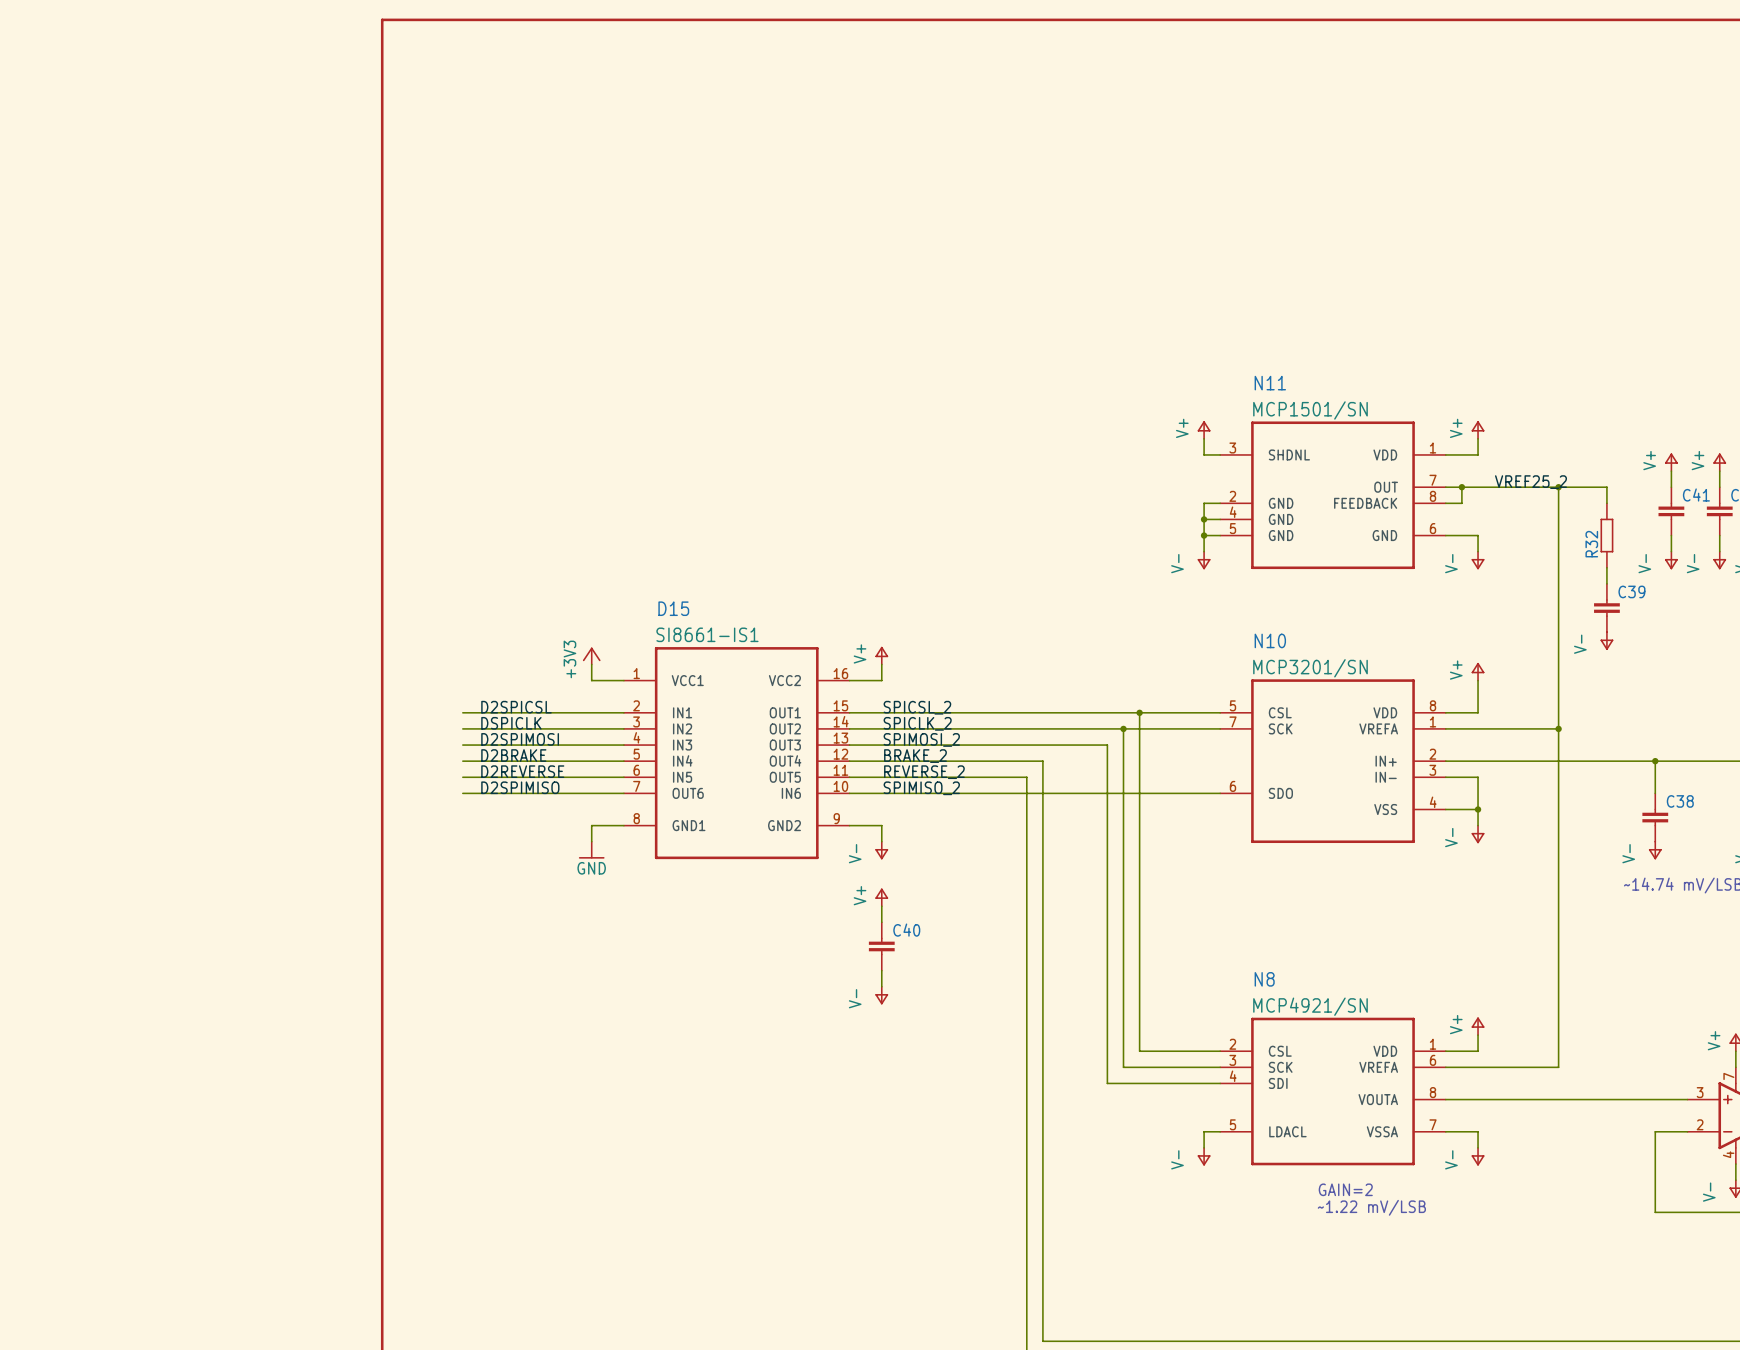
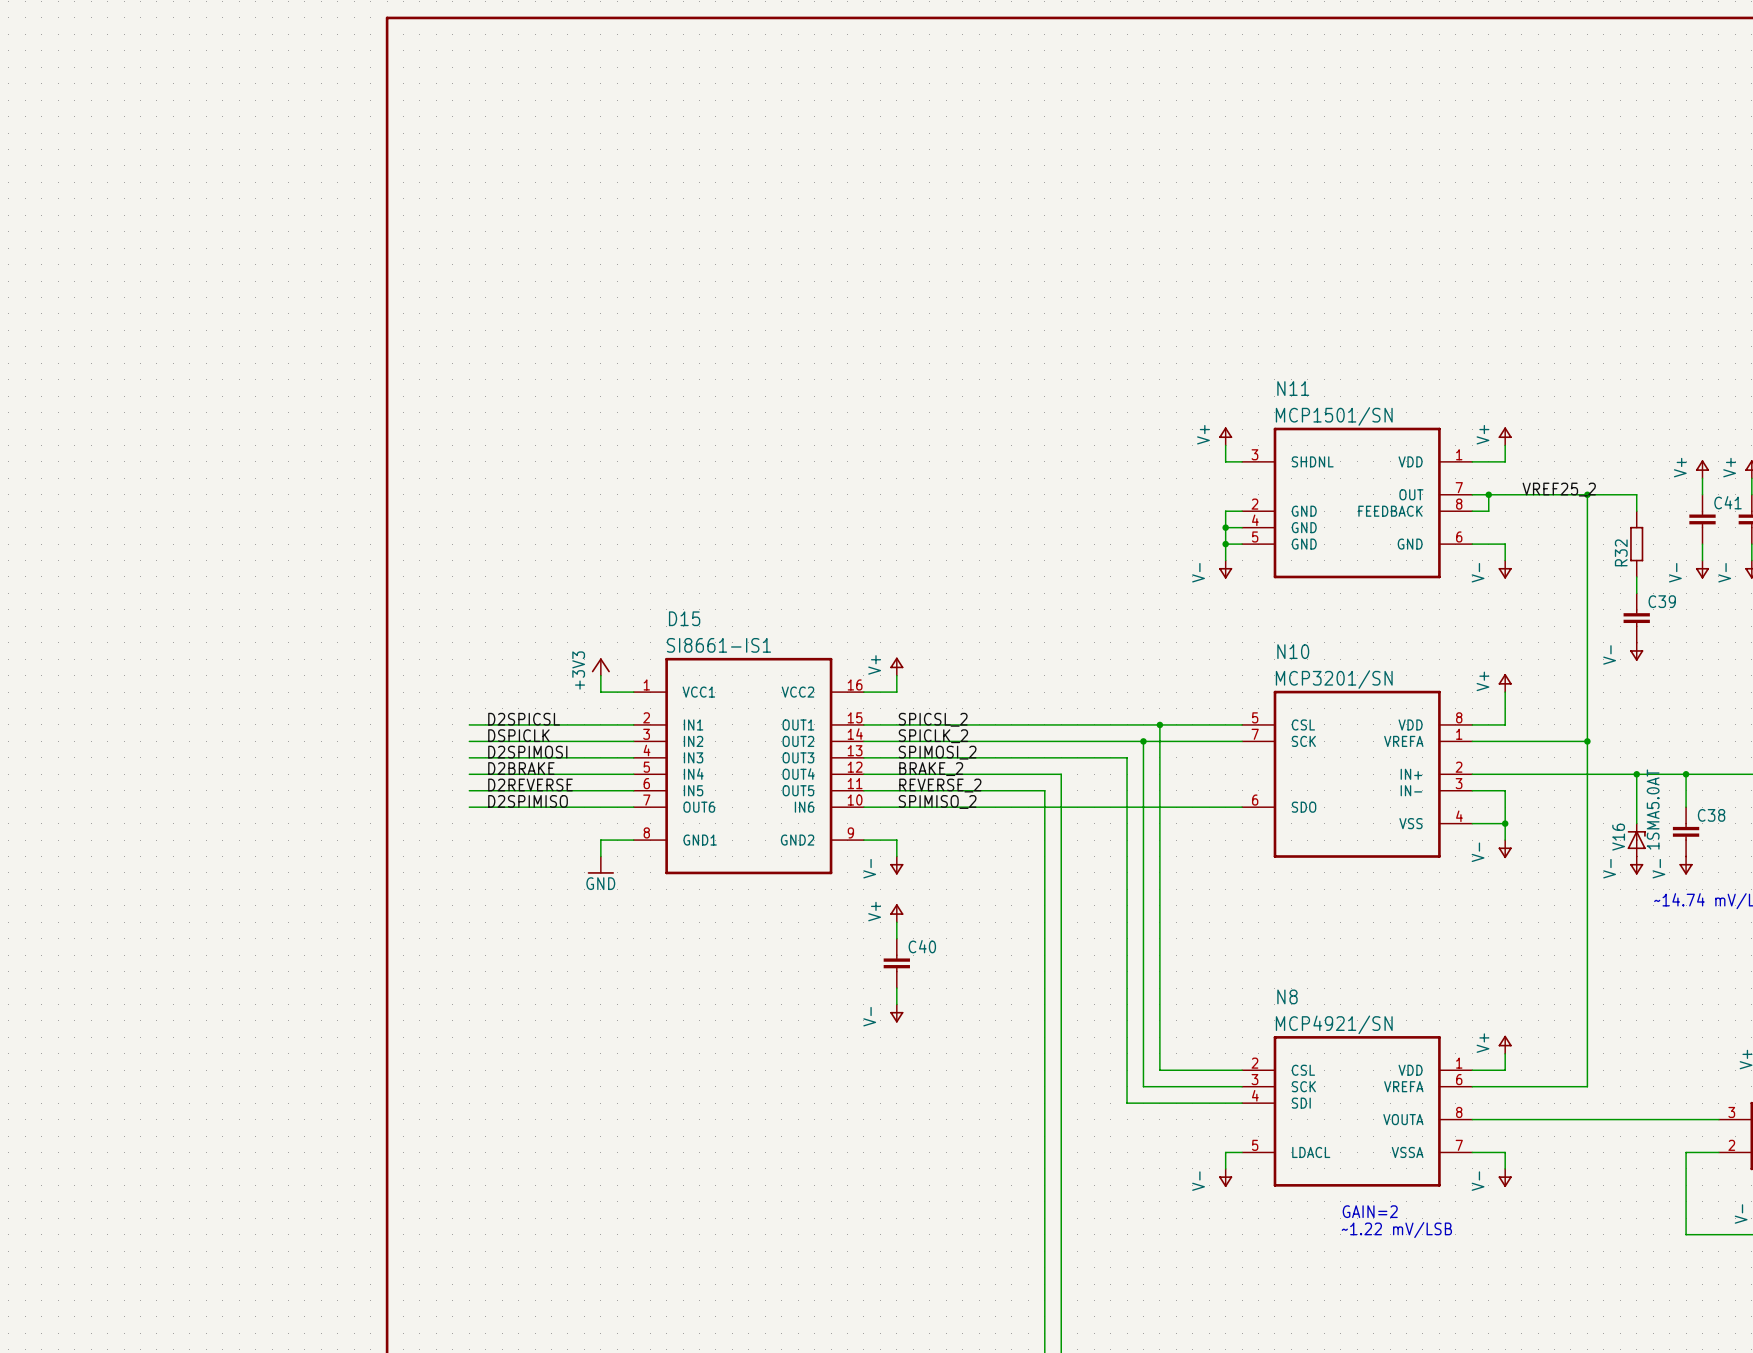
wire: none -> (1636, 774) (1636, 823)
junction: none -> (1636, 774)
V16: none -> 1SMA5.0AT (1636, 840)
power symbol: none -> V- (1636, 865)

